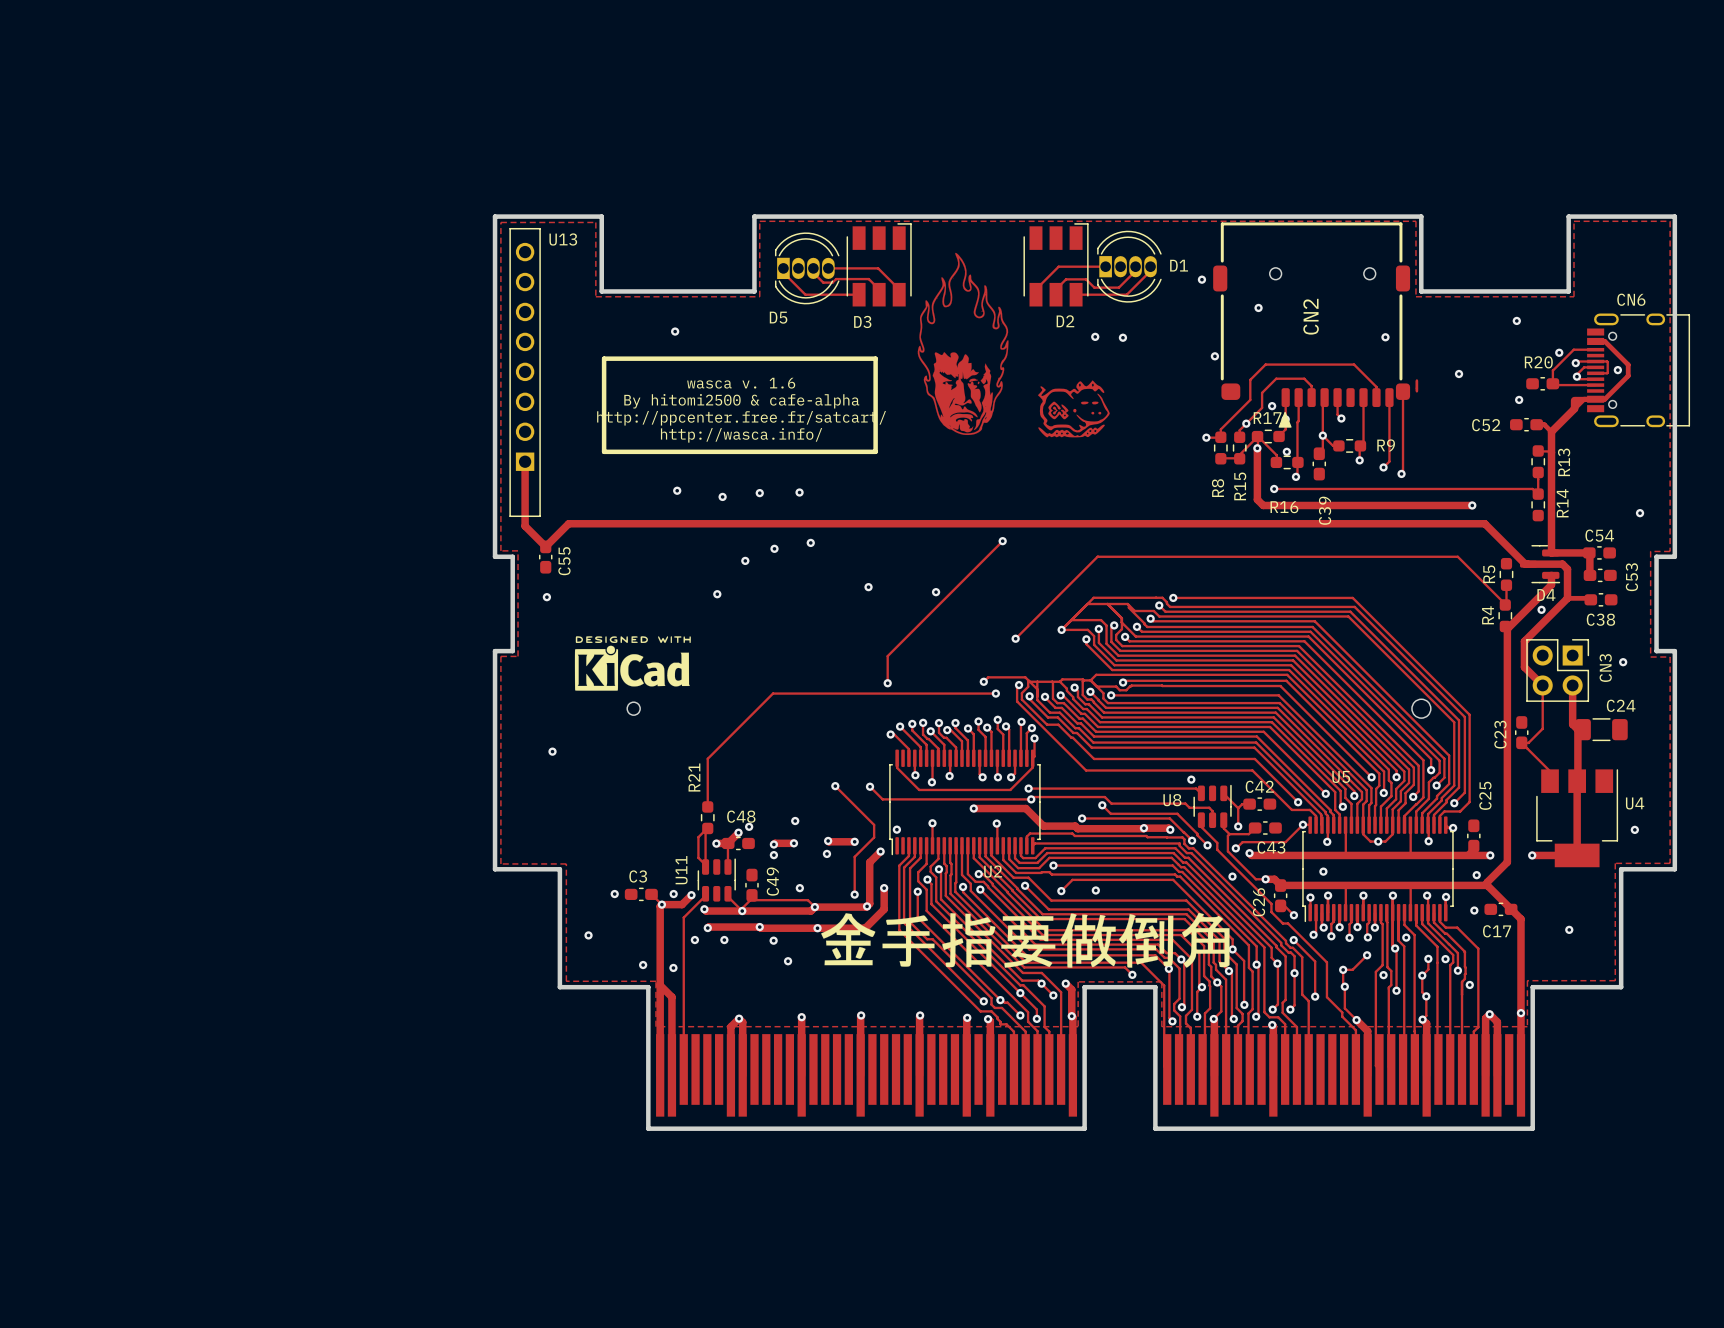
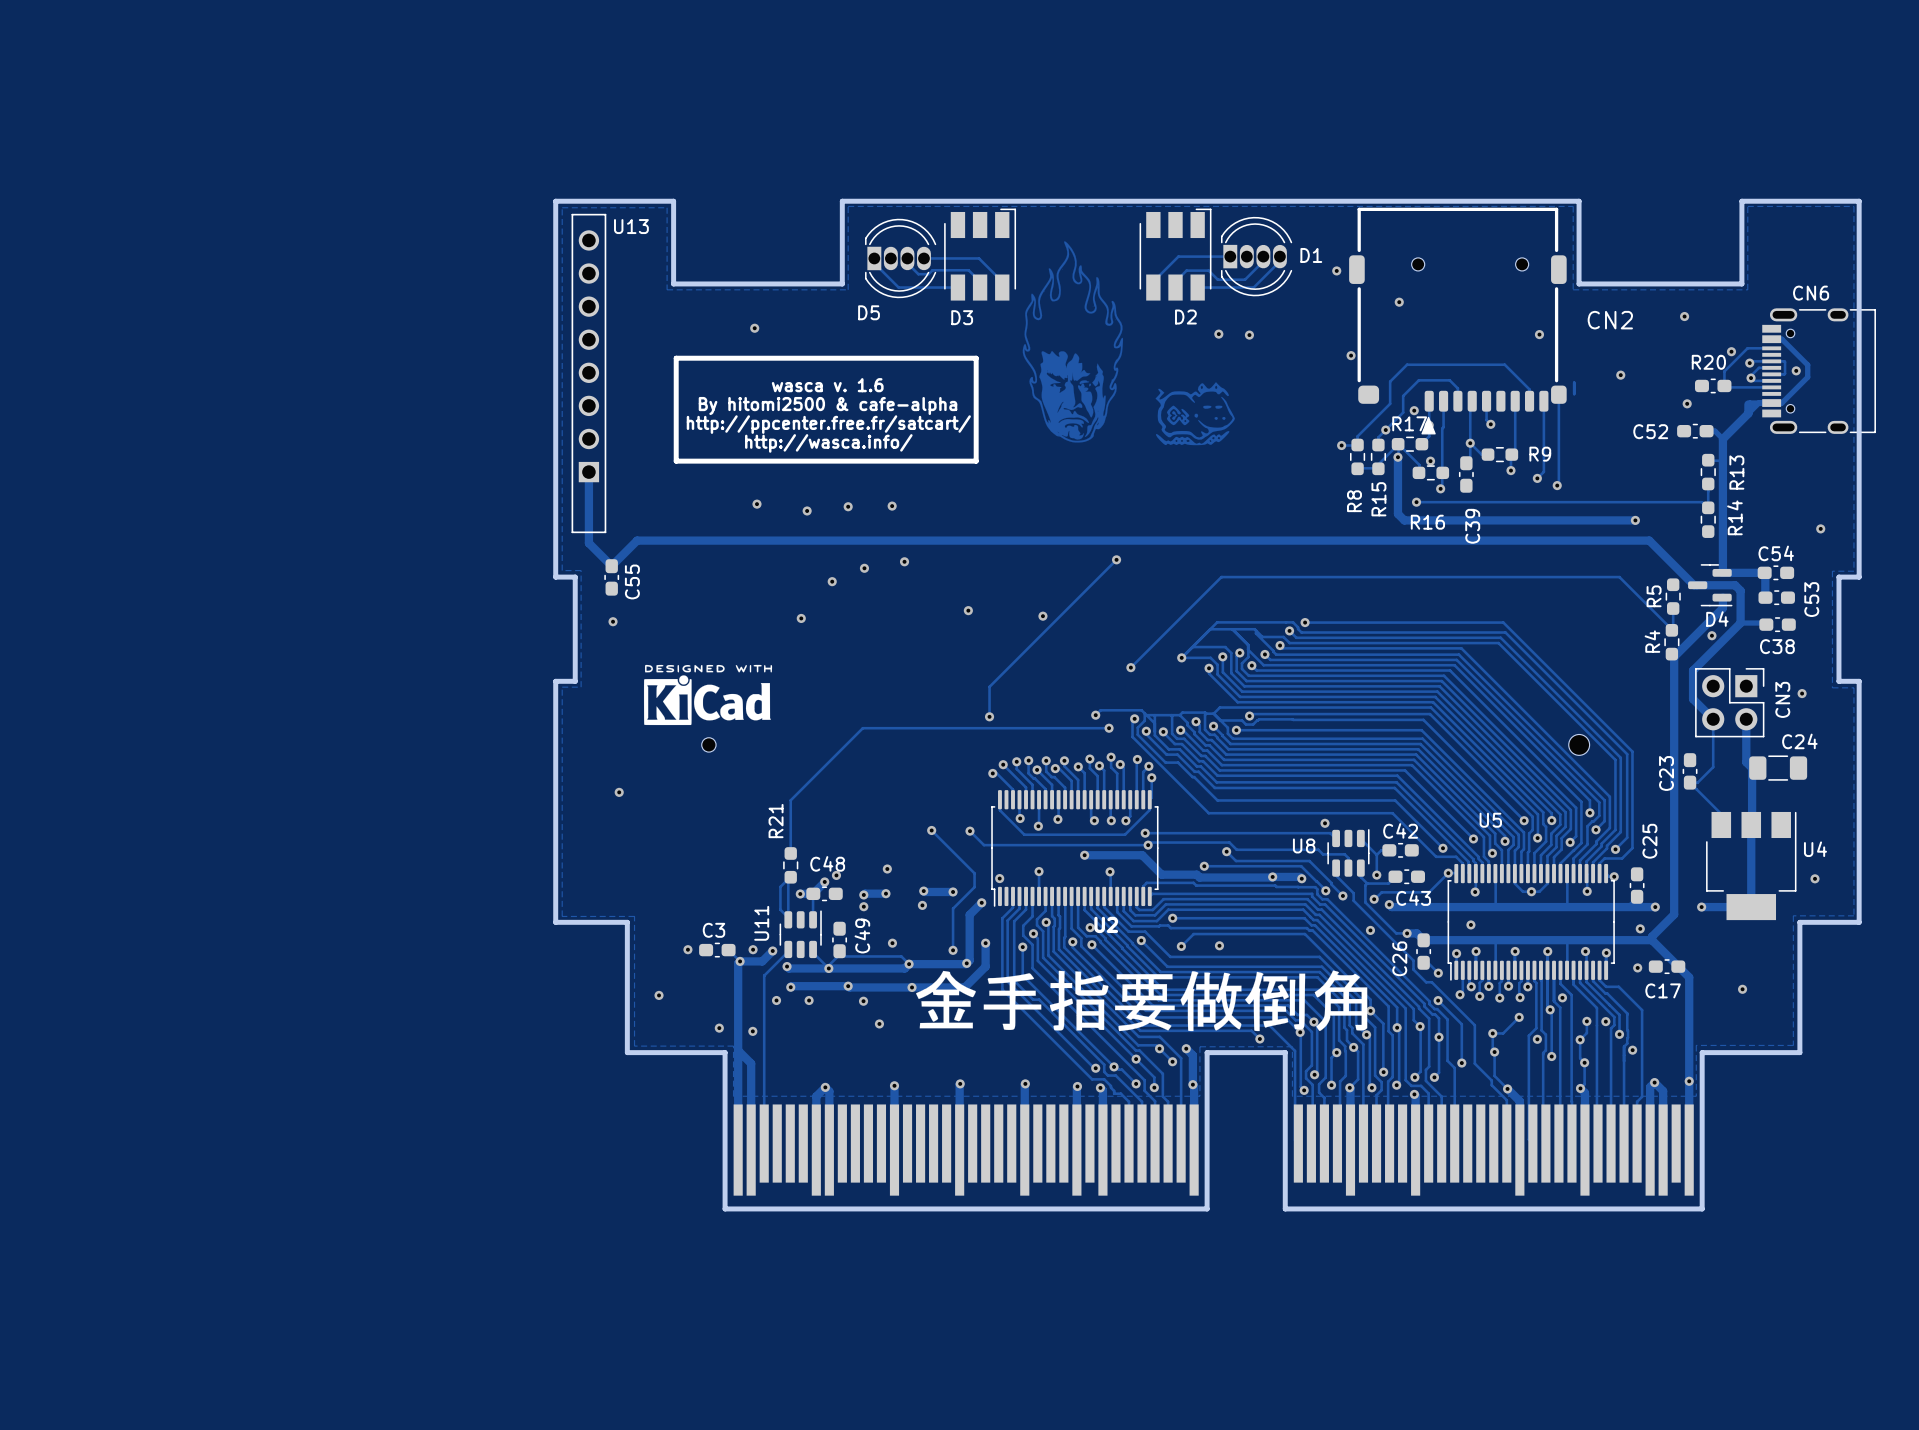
CN2 name rotation: 0° (1311, 316) -> 90° clockwise (1610, 320)
CN2 name position: CN2 (1311, 316) -> CN2 (1610, 320)

